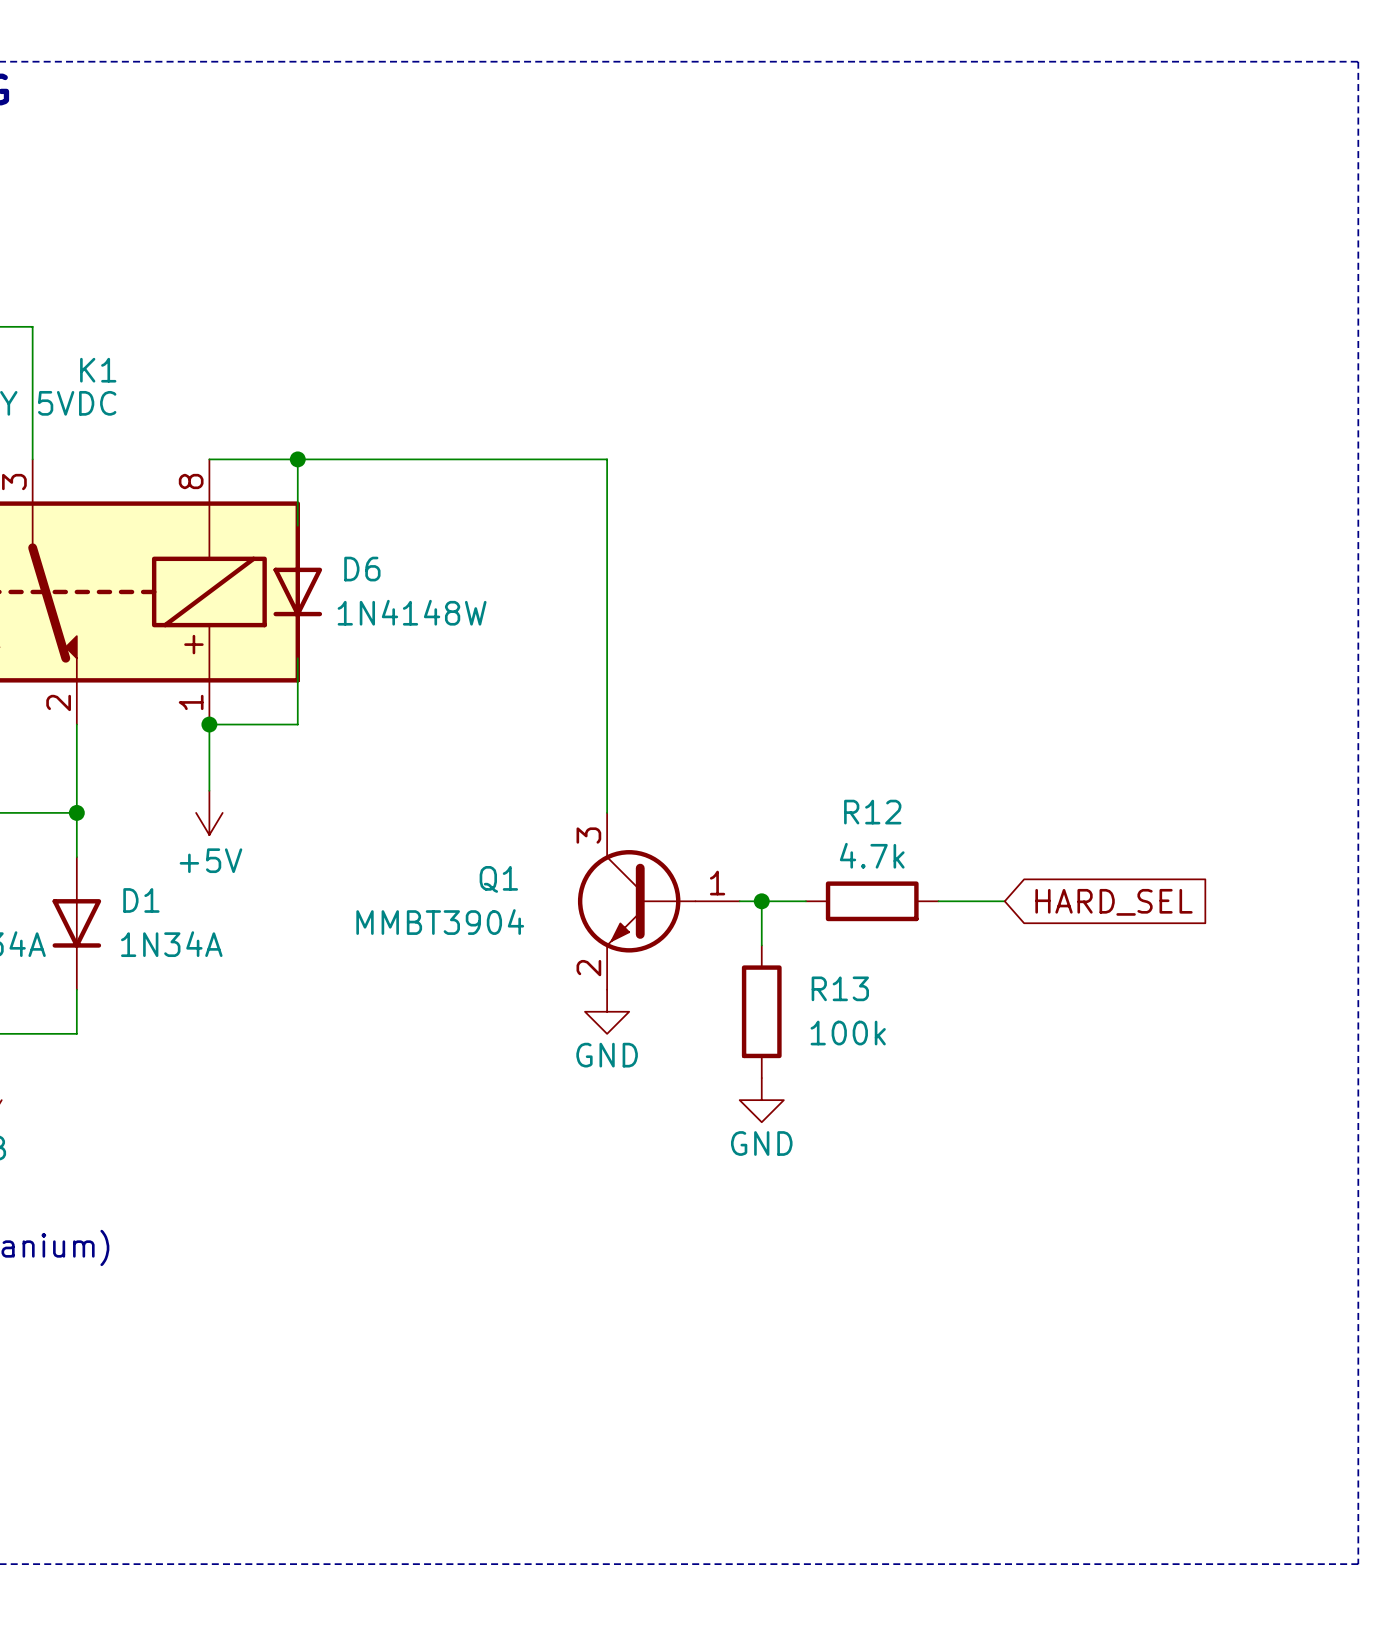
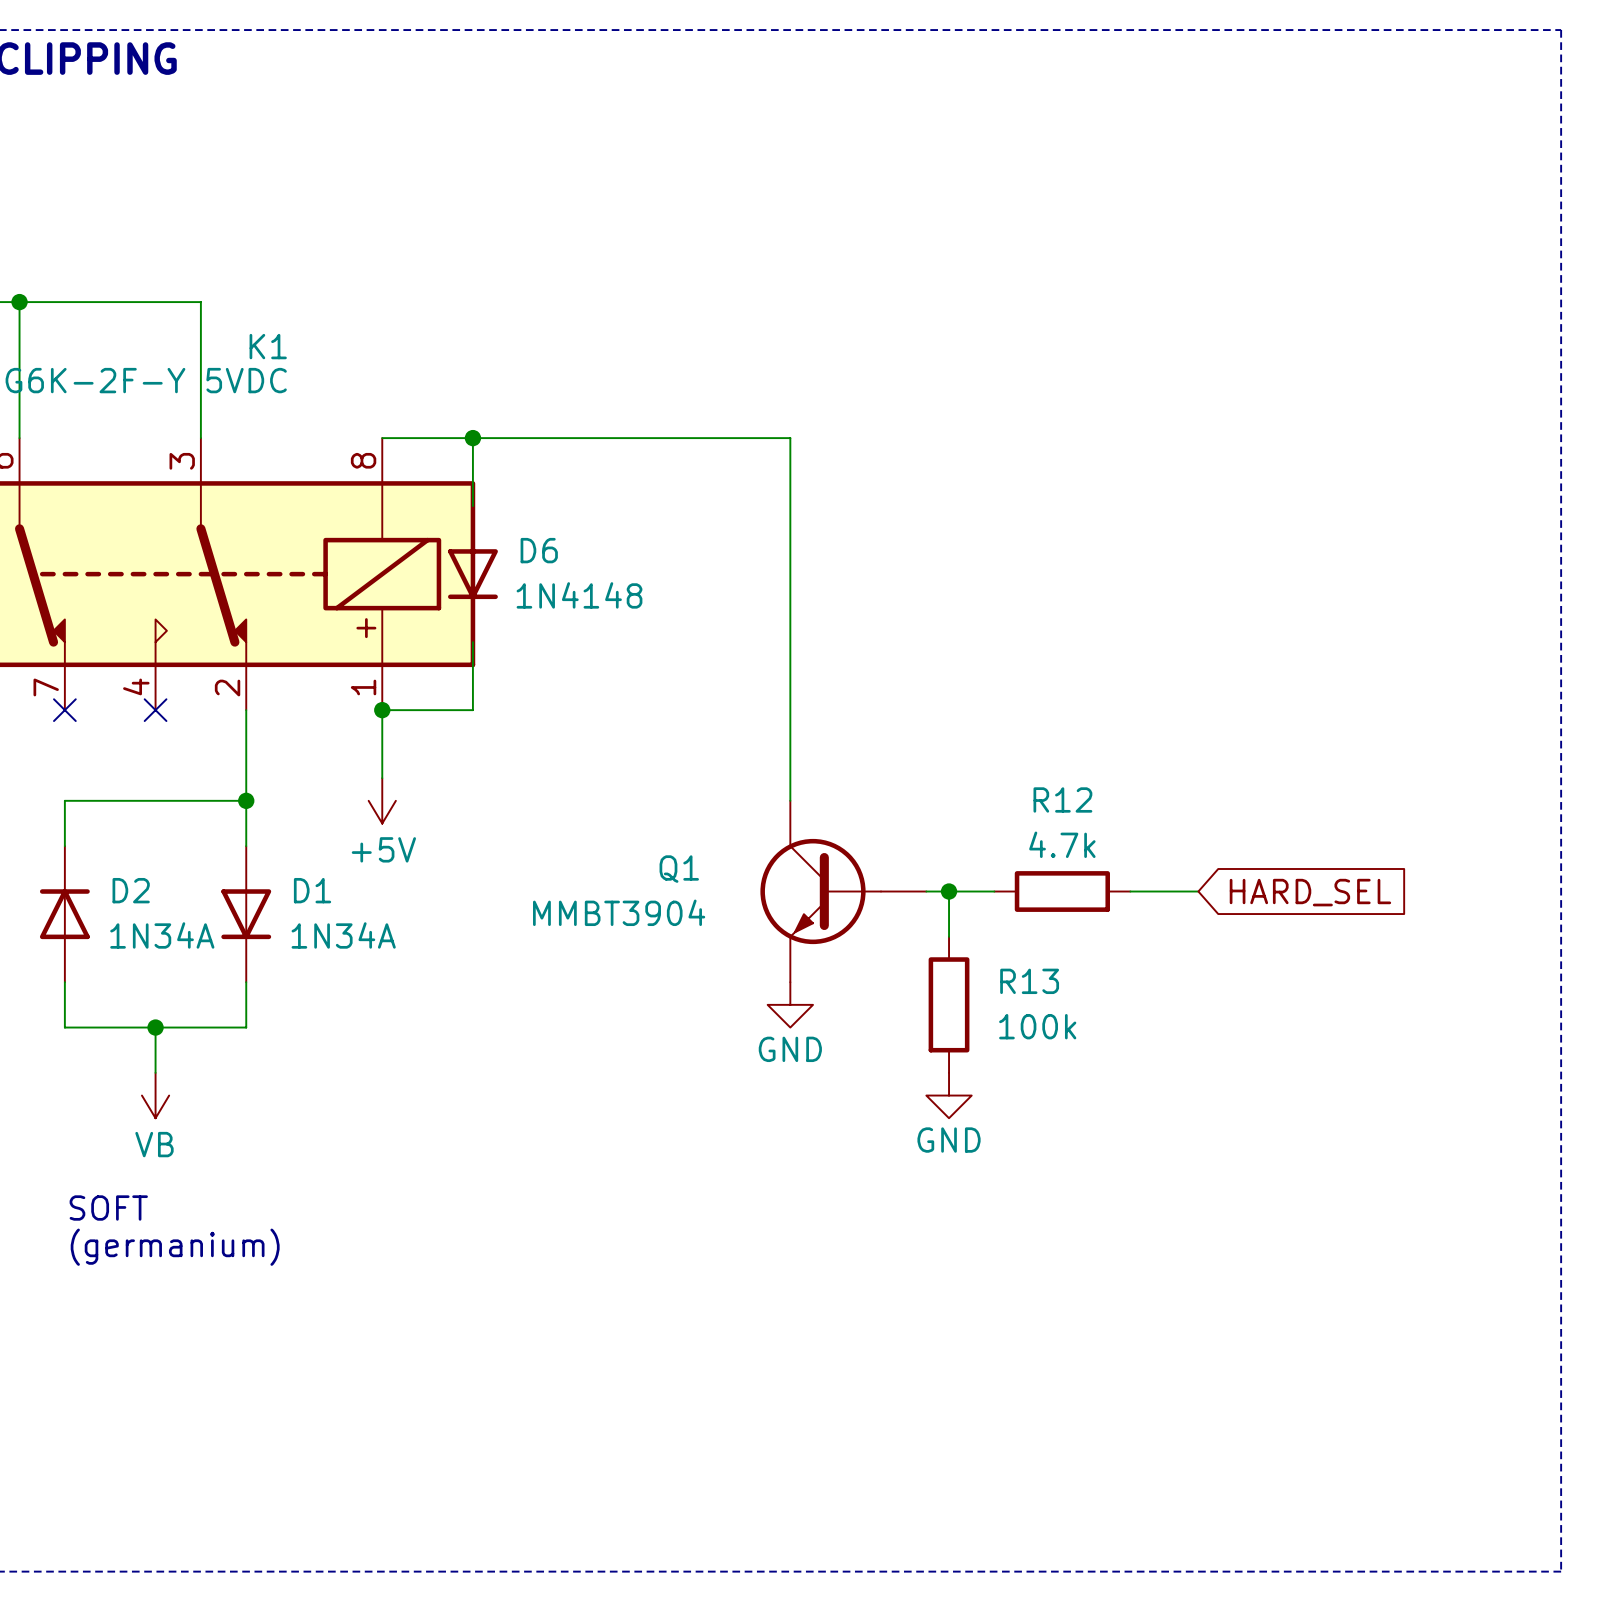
D6 value: 1N4148W (412, 612) -> 1N4148 (579, 595)
Q1 pin number: 3 (588, 835) -> none
Q1 pin number: 1 (717, 883) -> none
Q1 pin number: 2 (588, 968) -> none

